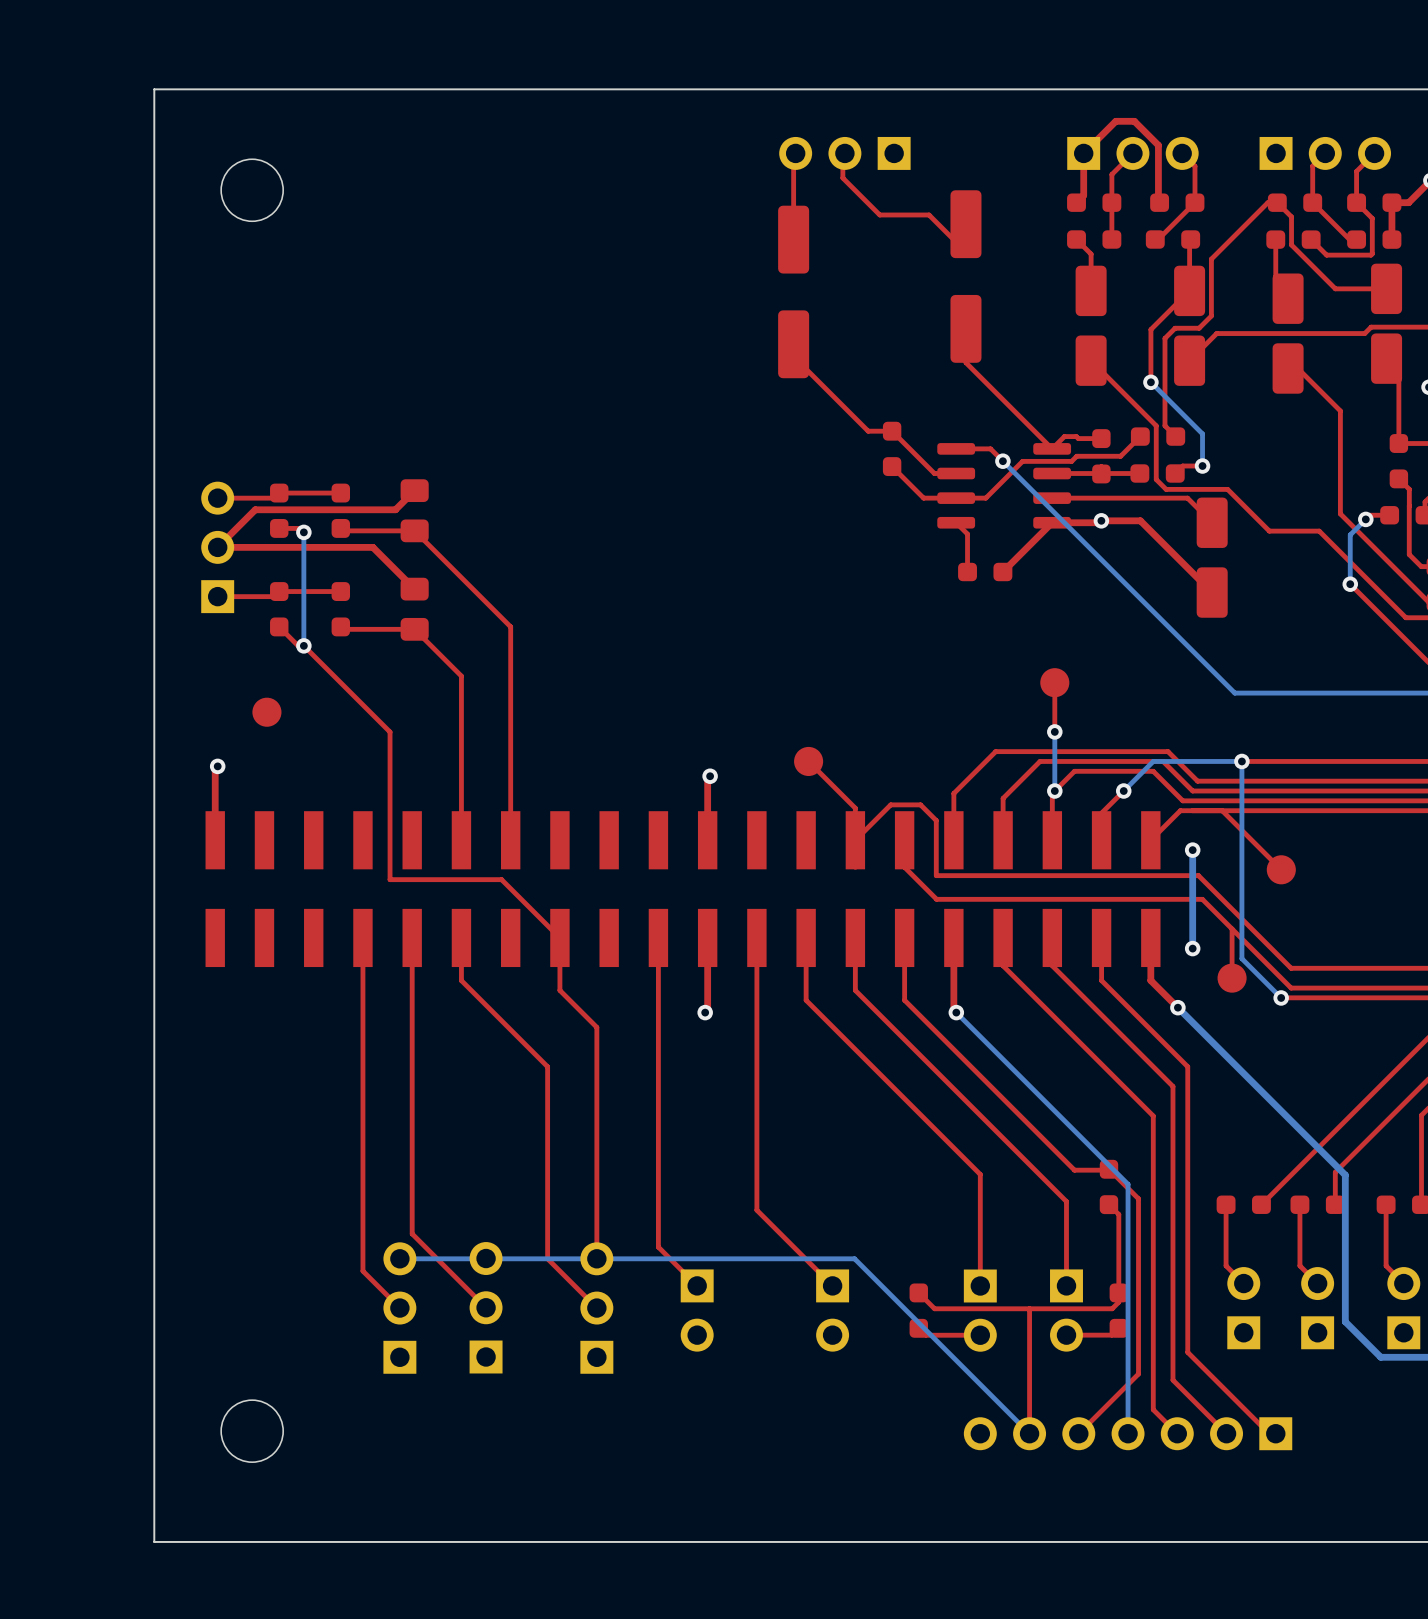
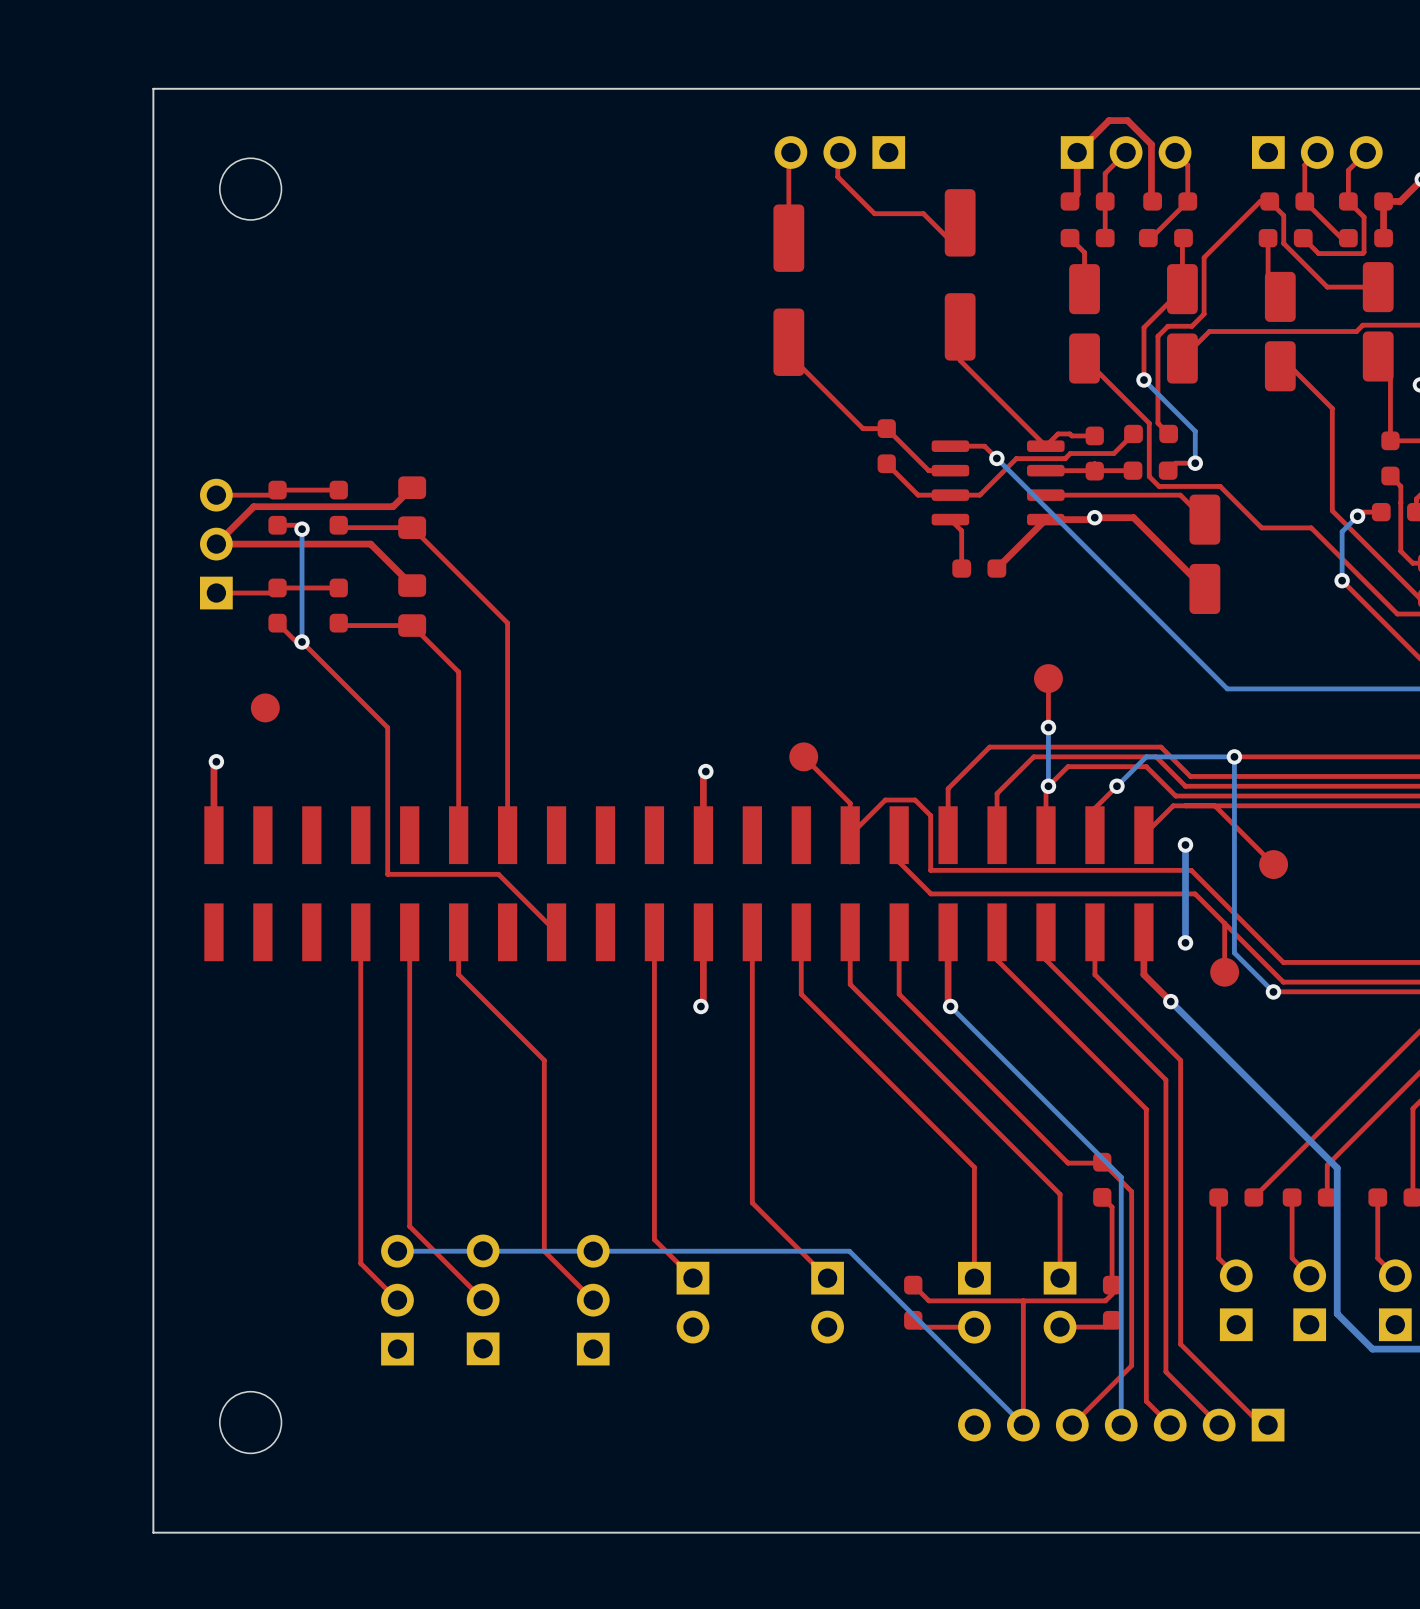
top track: (559, 937) (559, 990) (596, 1027) (596, 1258) -> none

